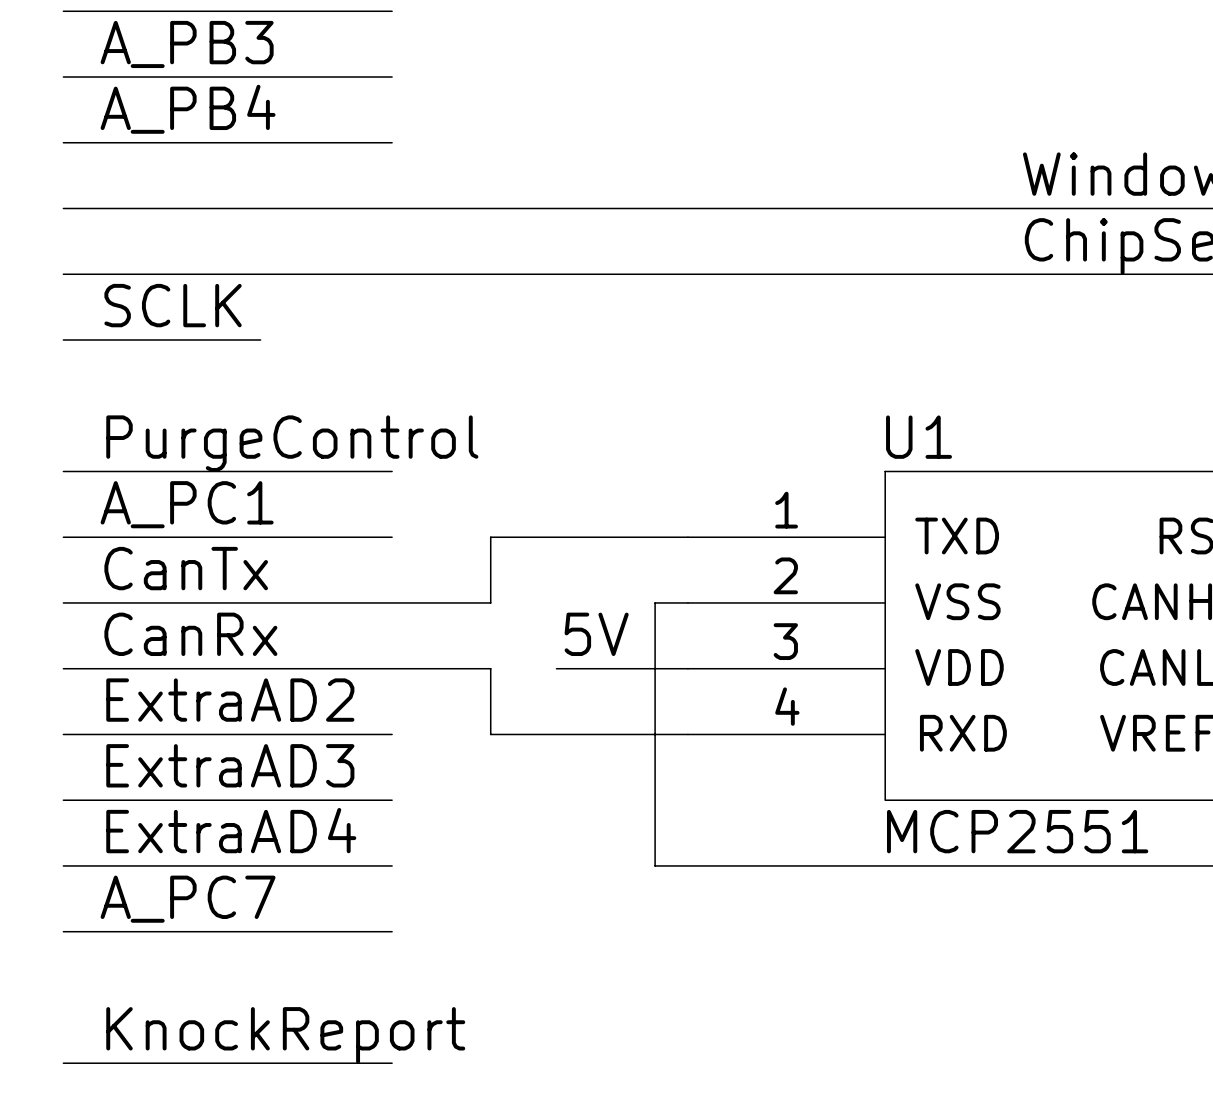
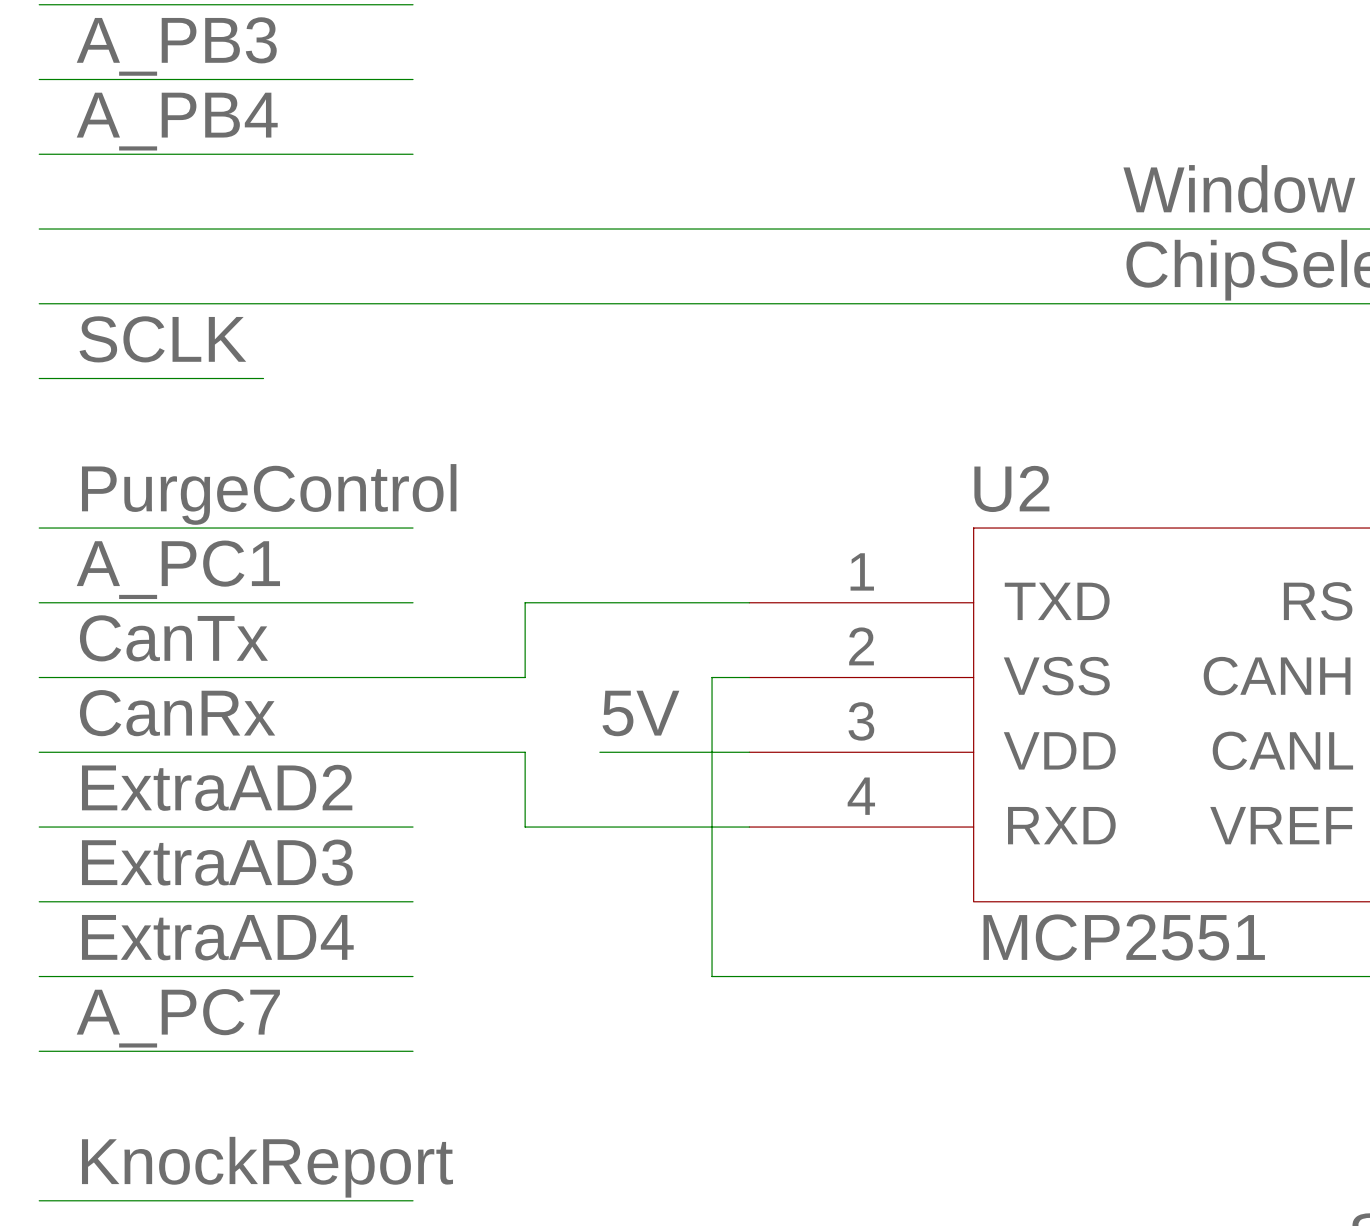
U1 name: U1 (919, 437) -> U2 (1011, 488)

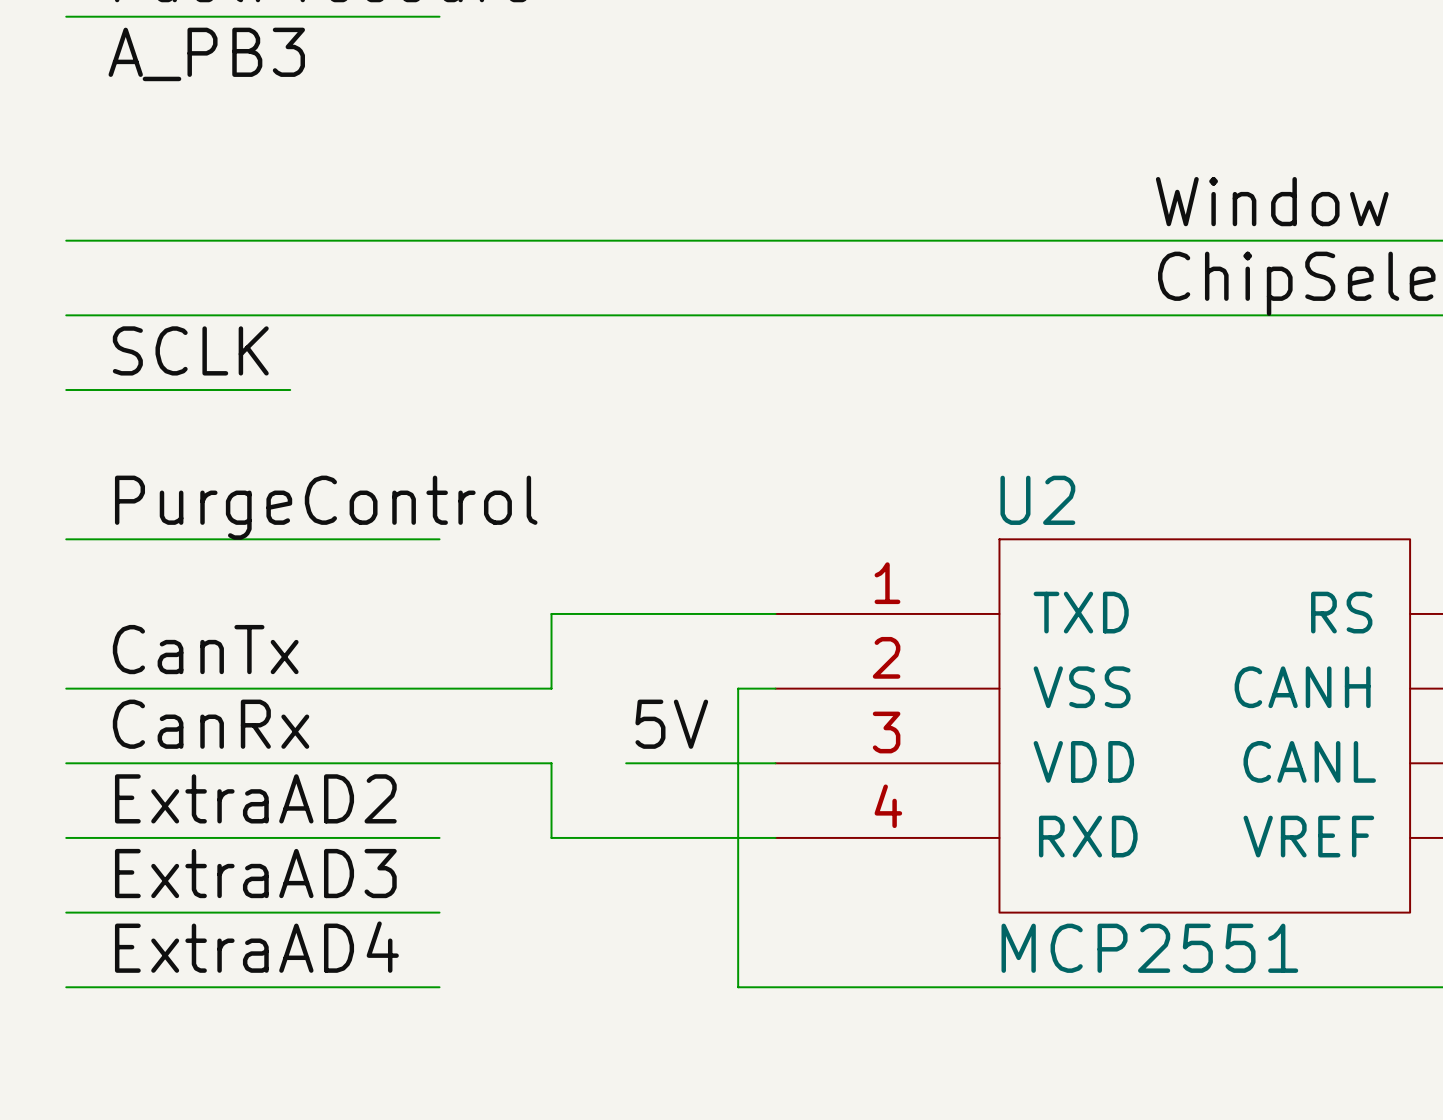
wire: (39, 79) (413, 79) -> none
label: A_PB4 (177, 121) -> none
wire: (39, 154) (413, 154) -> none
label: A_PC1 (178, 569) -> none
wire: (39, 602) (413, 602) -> none
label: A_PC7 (178, 1018) -> none
wire: (39, 1051) (413, 1051) -> none

